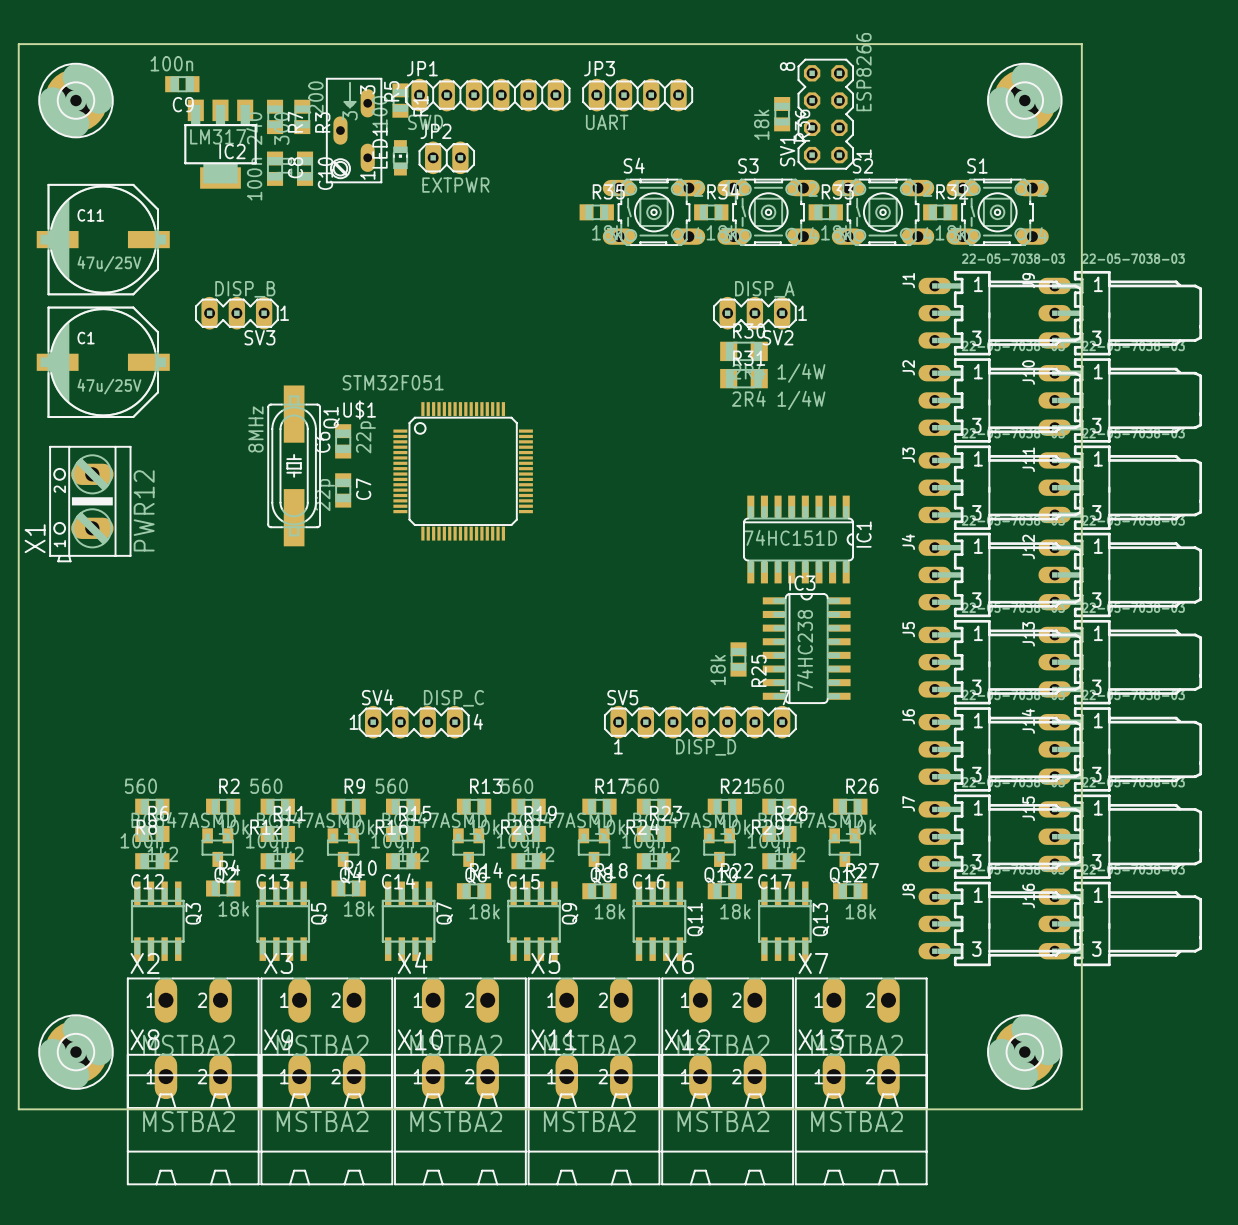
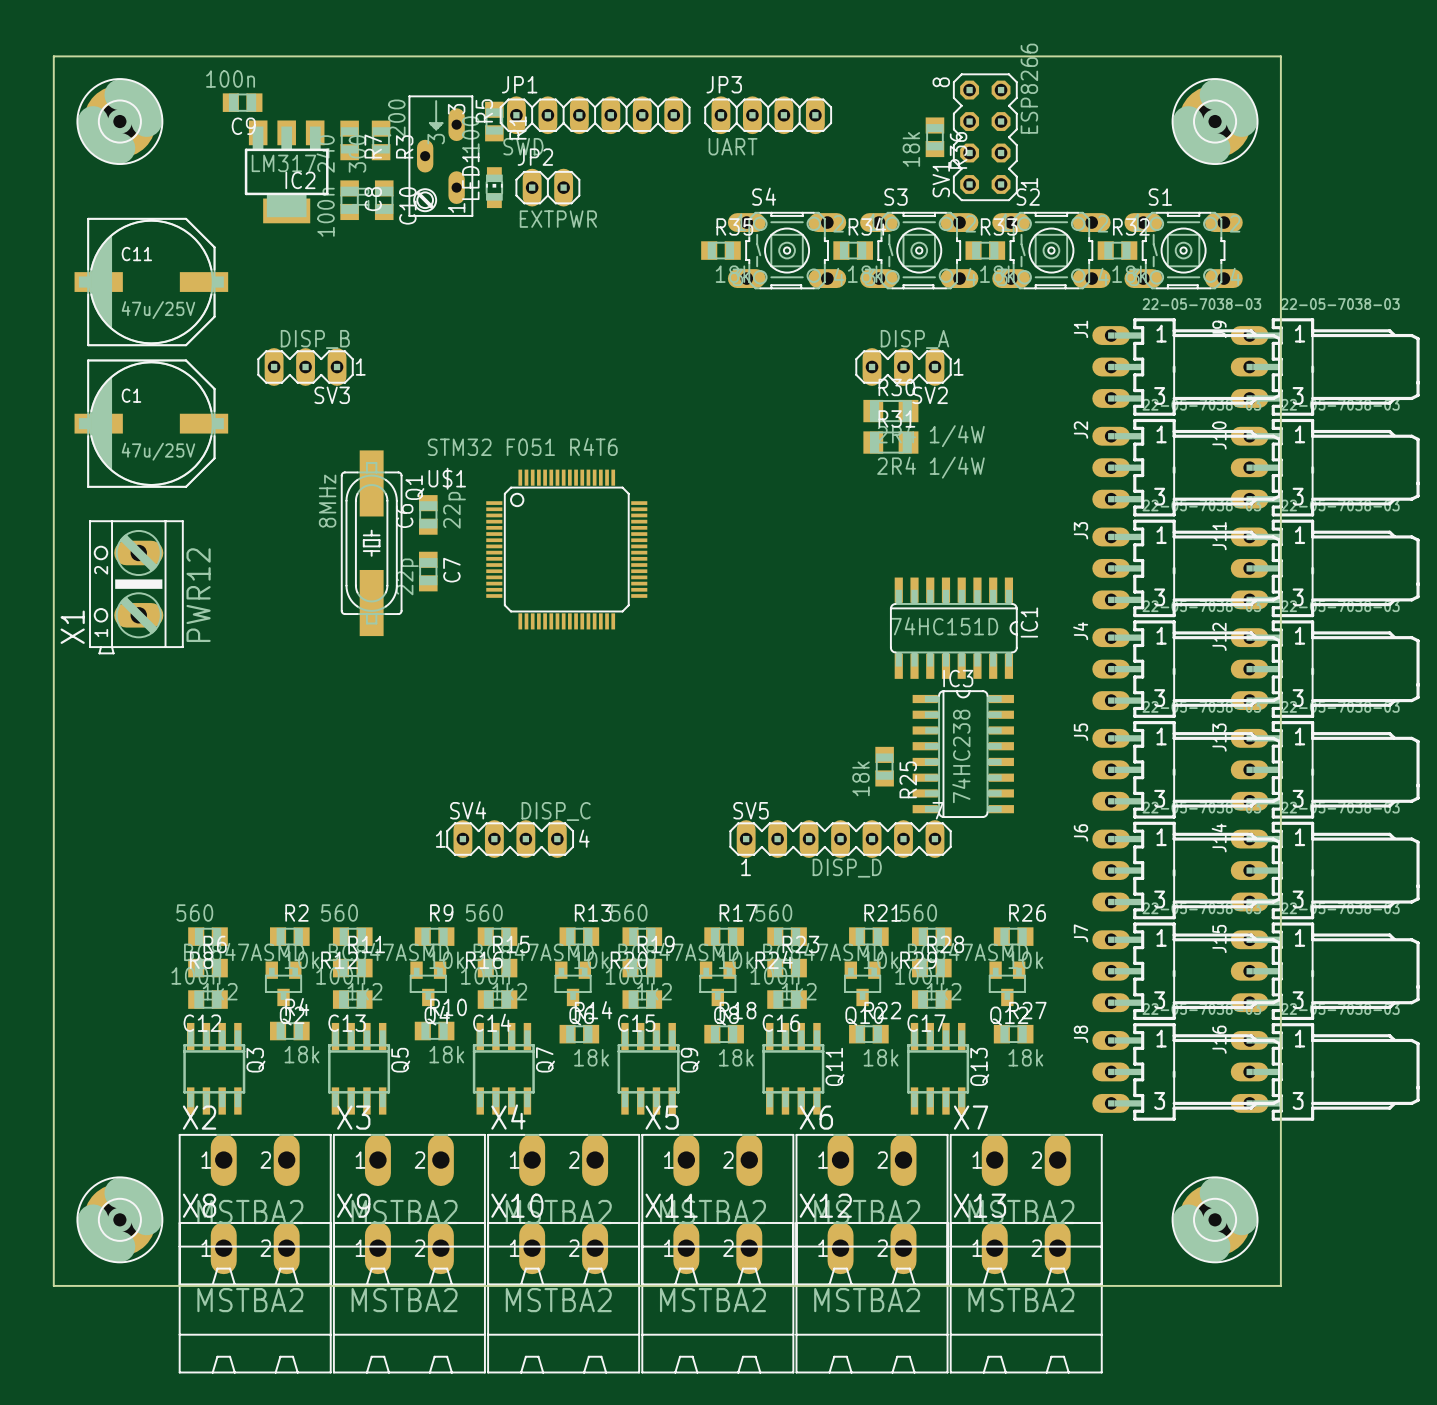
U$1 value: STM32F051 (393, 382) -> STM32 F051 R4T6 (522, 446)

